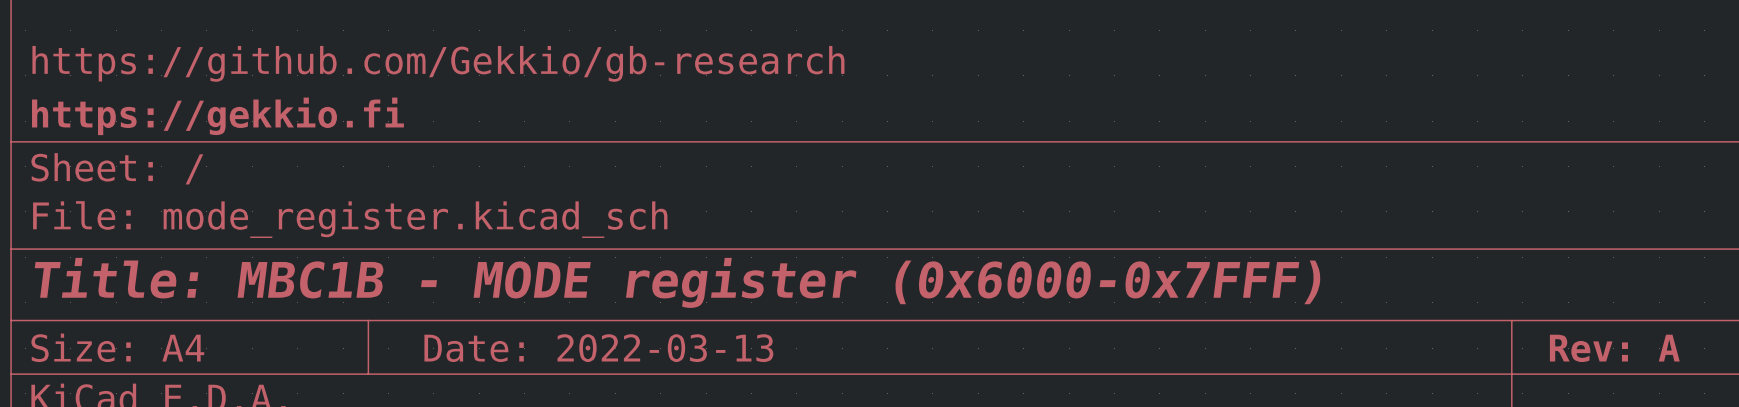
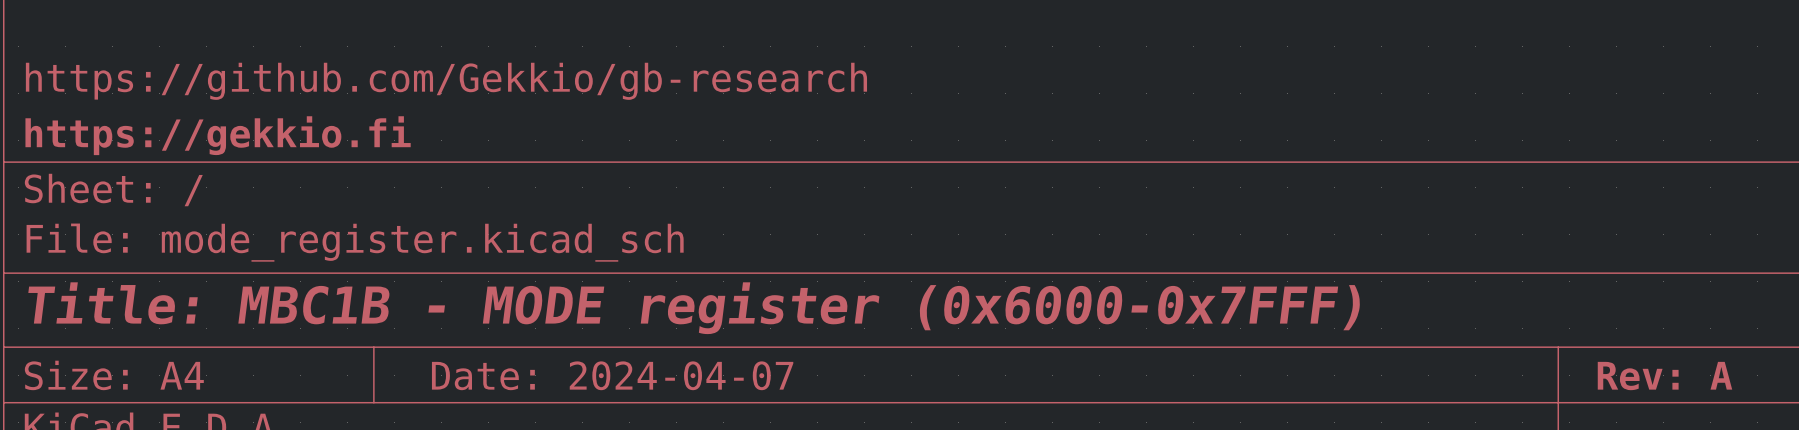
title block: Date: 2022-03-13 (598, 348) -> Date: 2024-04-07 (612, 375)

